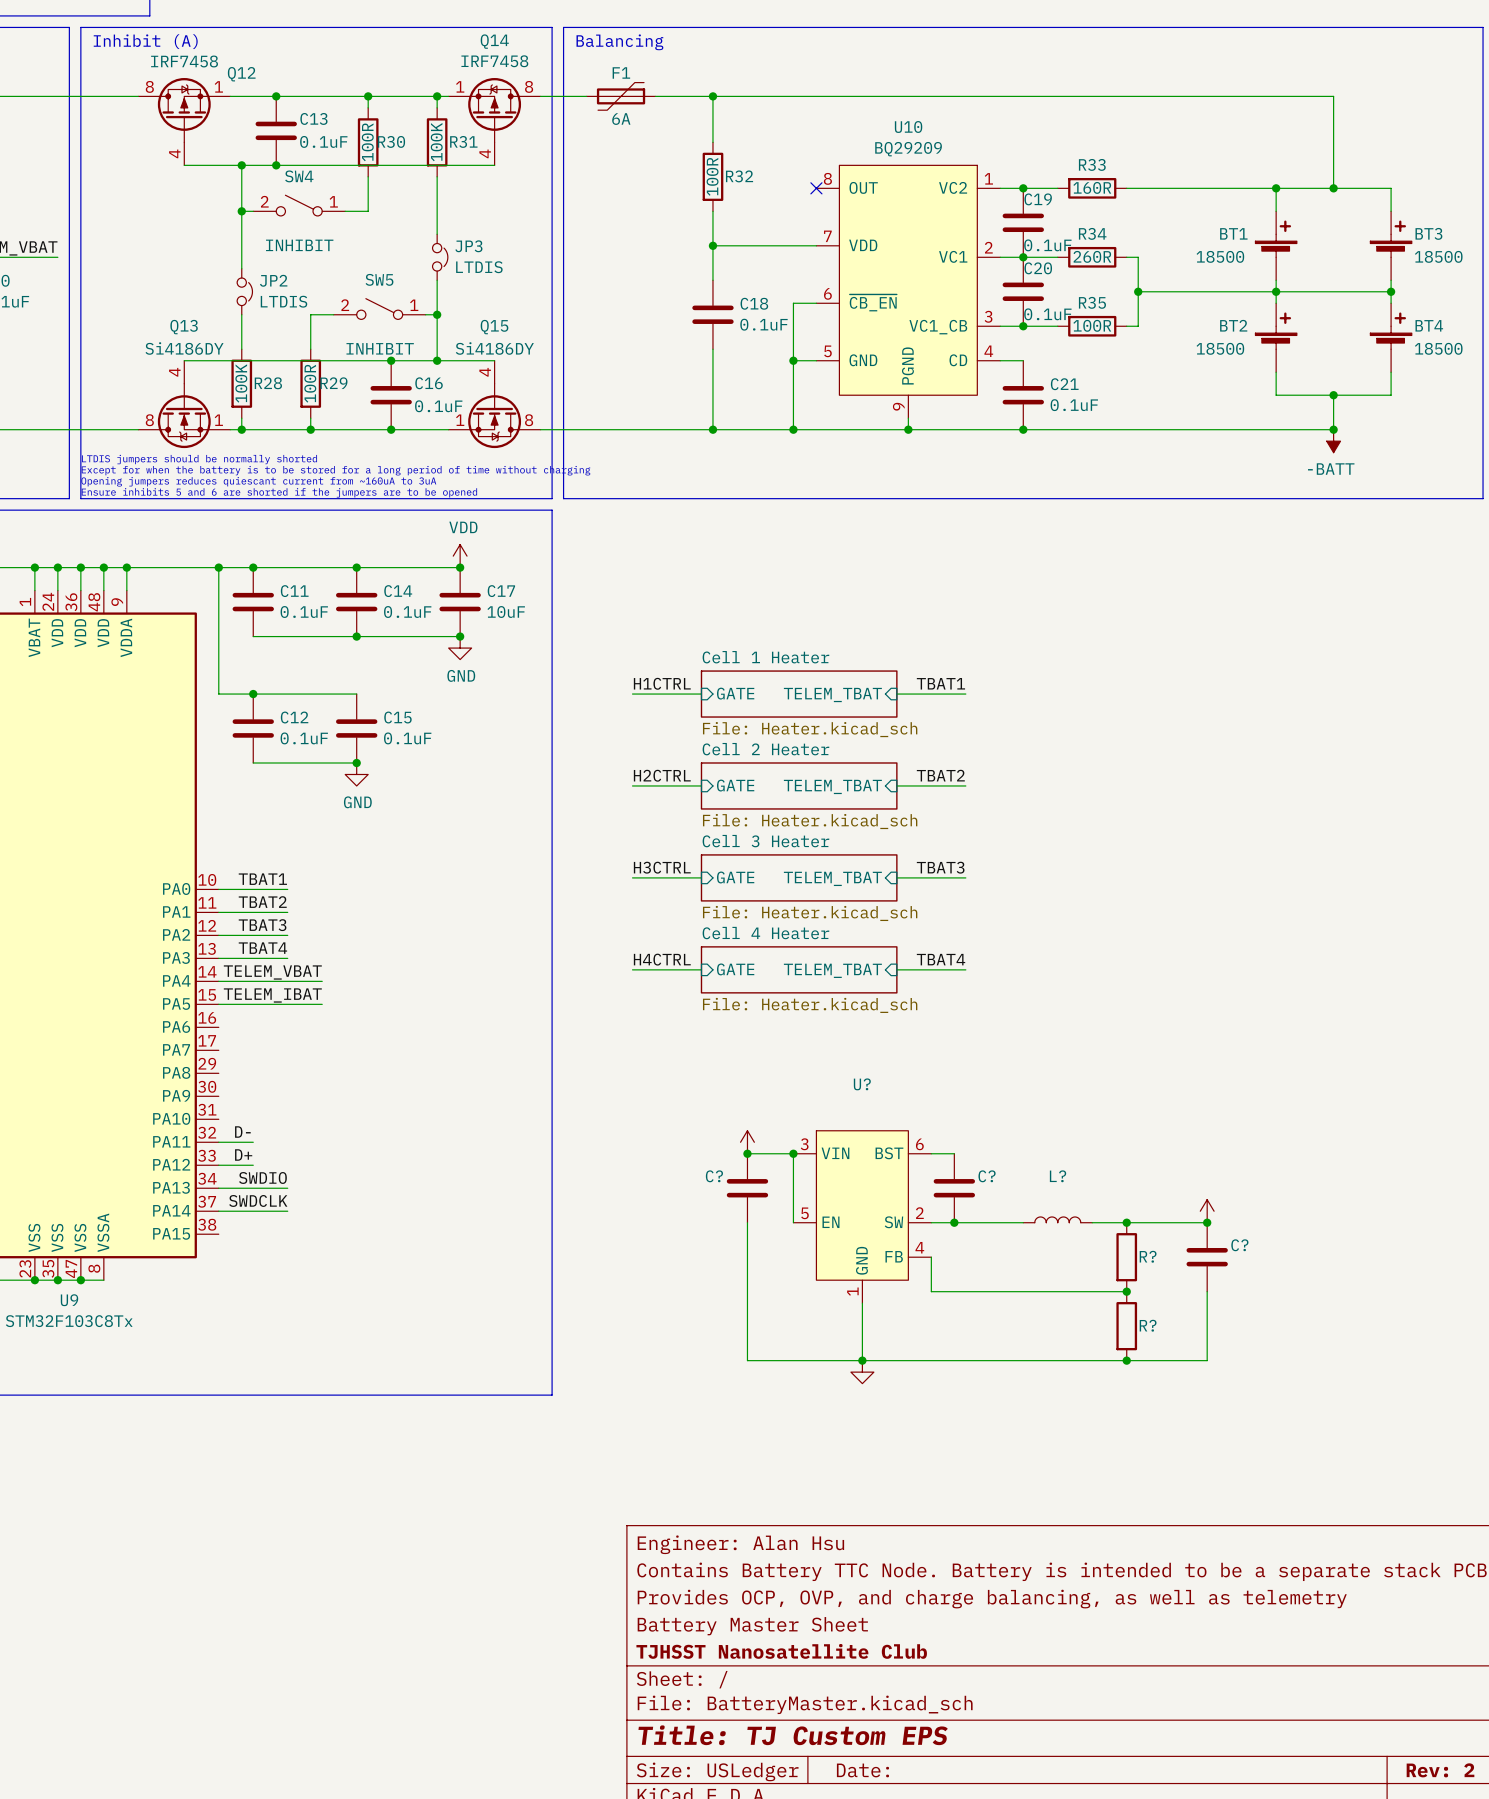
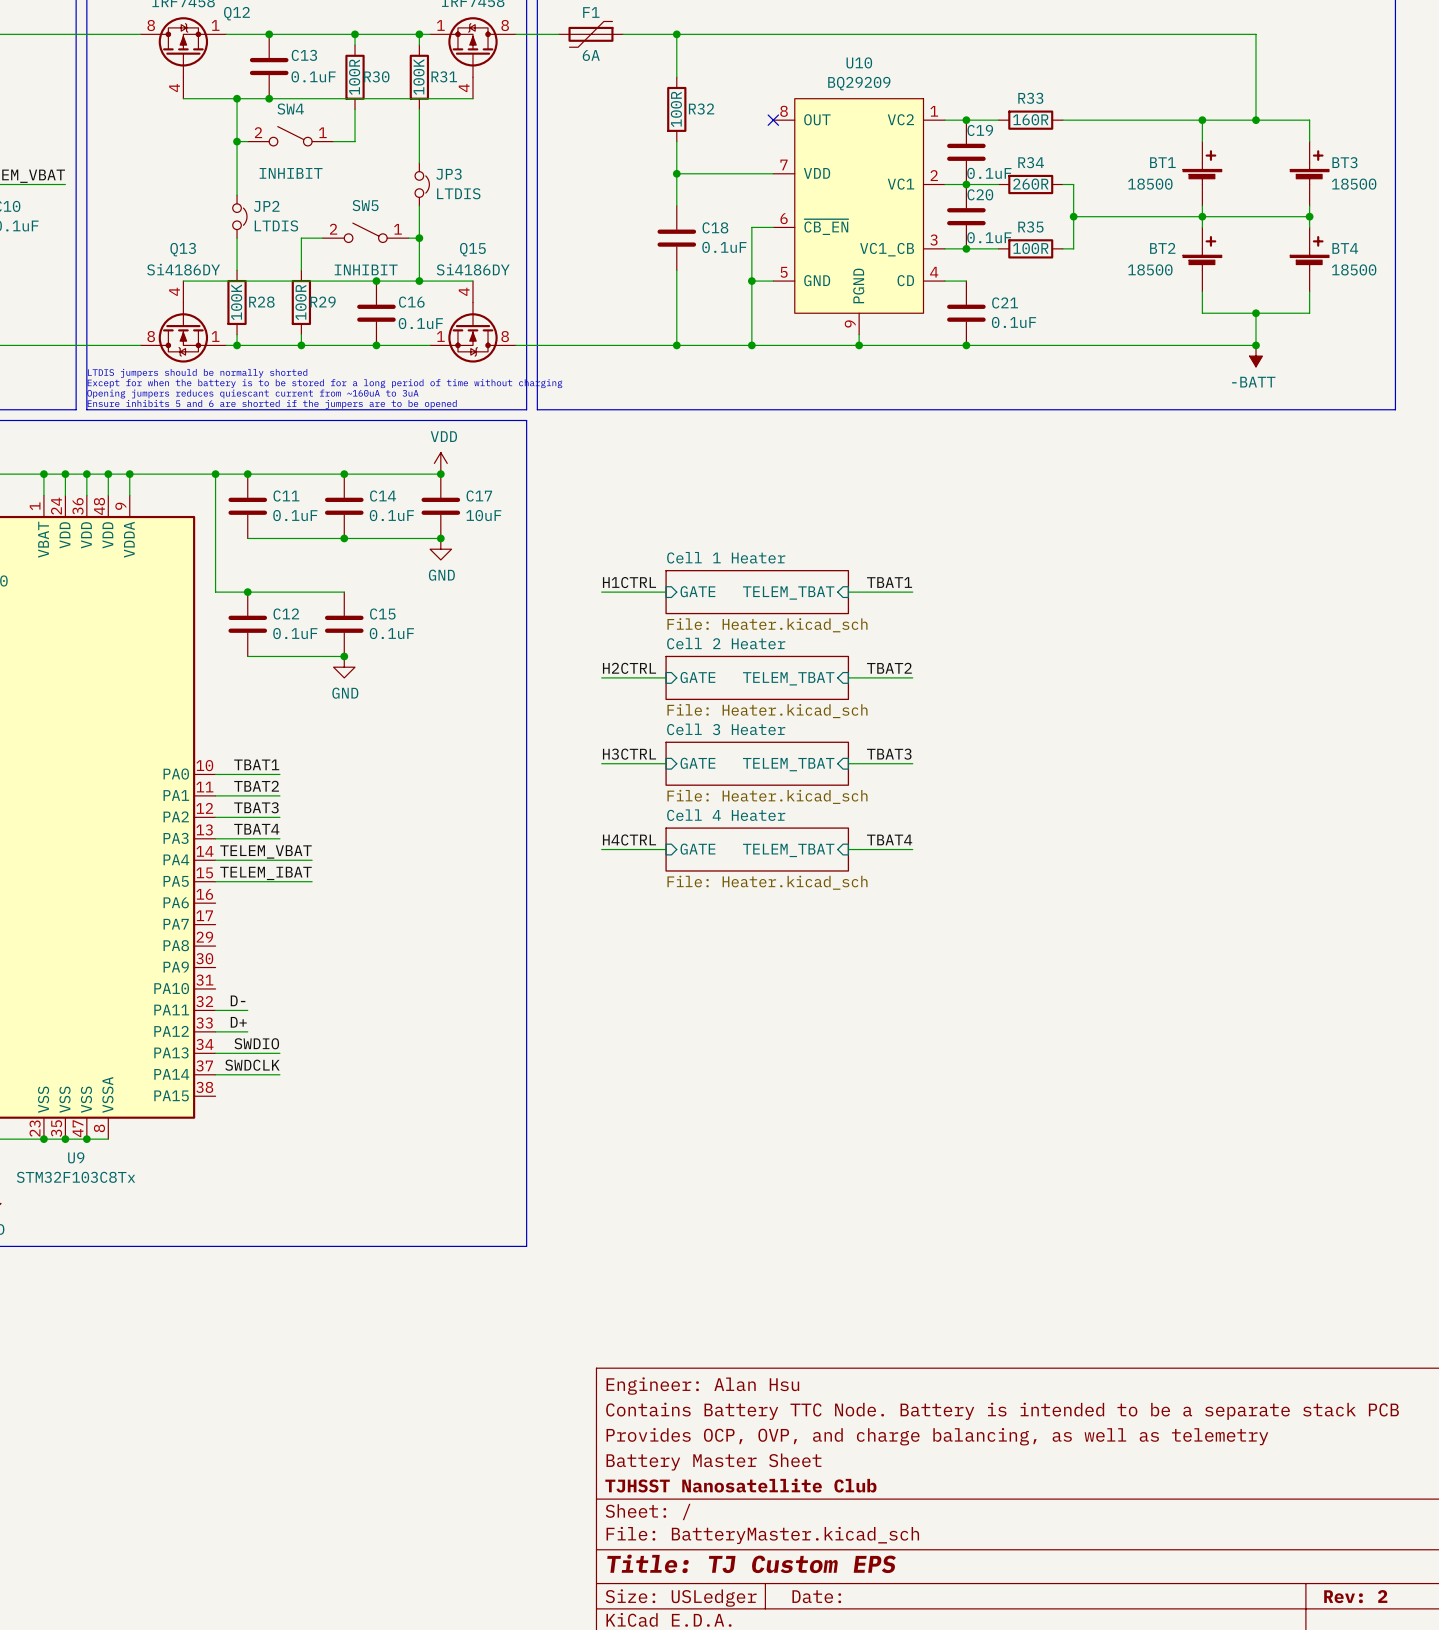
power symbol: (747, 1142) -> none
wire: (747, 1153) (793, 1153) (793, 1222) -> none
junction: (747, 1153) -> none
junction: (793, 1153) -> none
wire: (931, 1153) (954, 1153) -> none
C?: (747, 1188) -> none
C?: (954, 1188) -> none
power symbol: (1207, 1211) -> none
U?: (862, 1216) -> none
L?: (1057, 1219) -> none
wire: (747, 1222) (747, 1360) (1207, 1360) (1207, 1291) -> none
wire: (931, 1222) (1023, 1222) -> none
junction: (954, 1222) -> none
wire: (1092, 1222) (1207, 1222) -> none
junction: (1126, 1222) -> none
junction: (1207, 1222) -> none
wire: (931, 1257) (931, 1291) (1126, 1291) -> none
R?: (1126, 1257) -> none
C?: (1207, 1257) -> none
junction: (1126, 1291) -> none
wire: (862, 1303) (862, 1360) -> none
R?: (1126, 1326) -> none
junction: (862, 1360) -> none
junction: (1126, 1360) -> none
power symbol: (862, 1372) -> none

